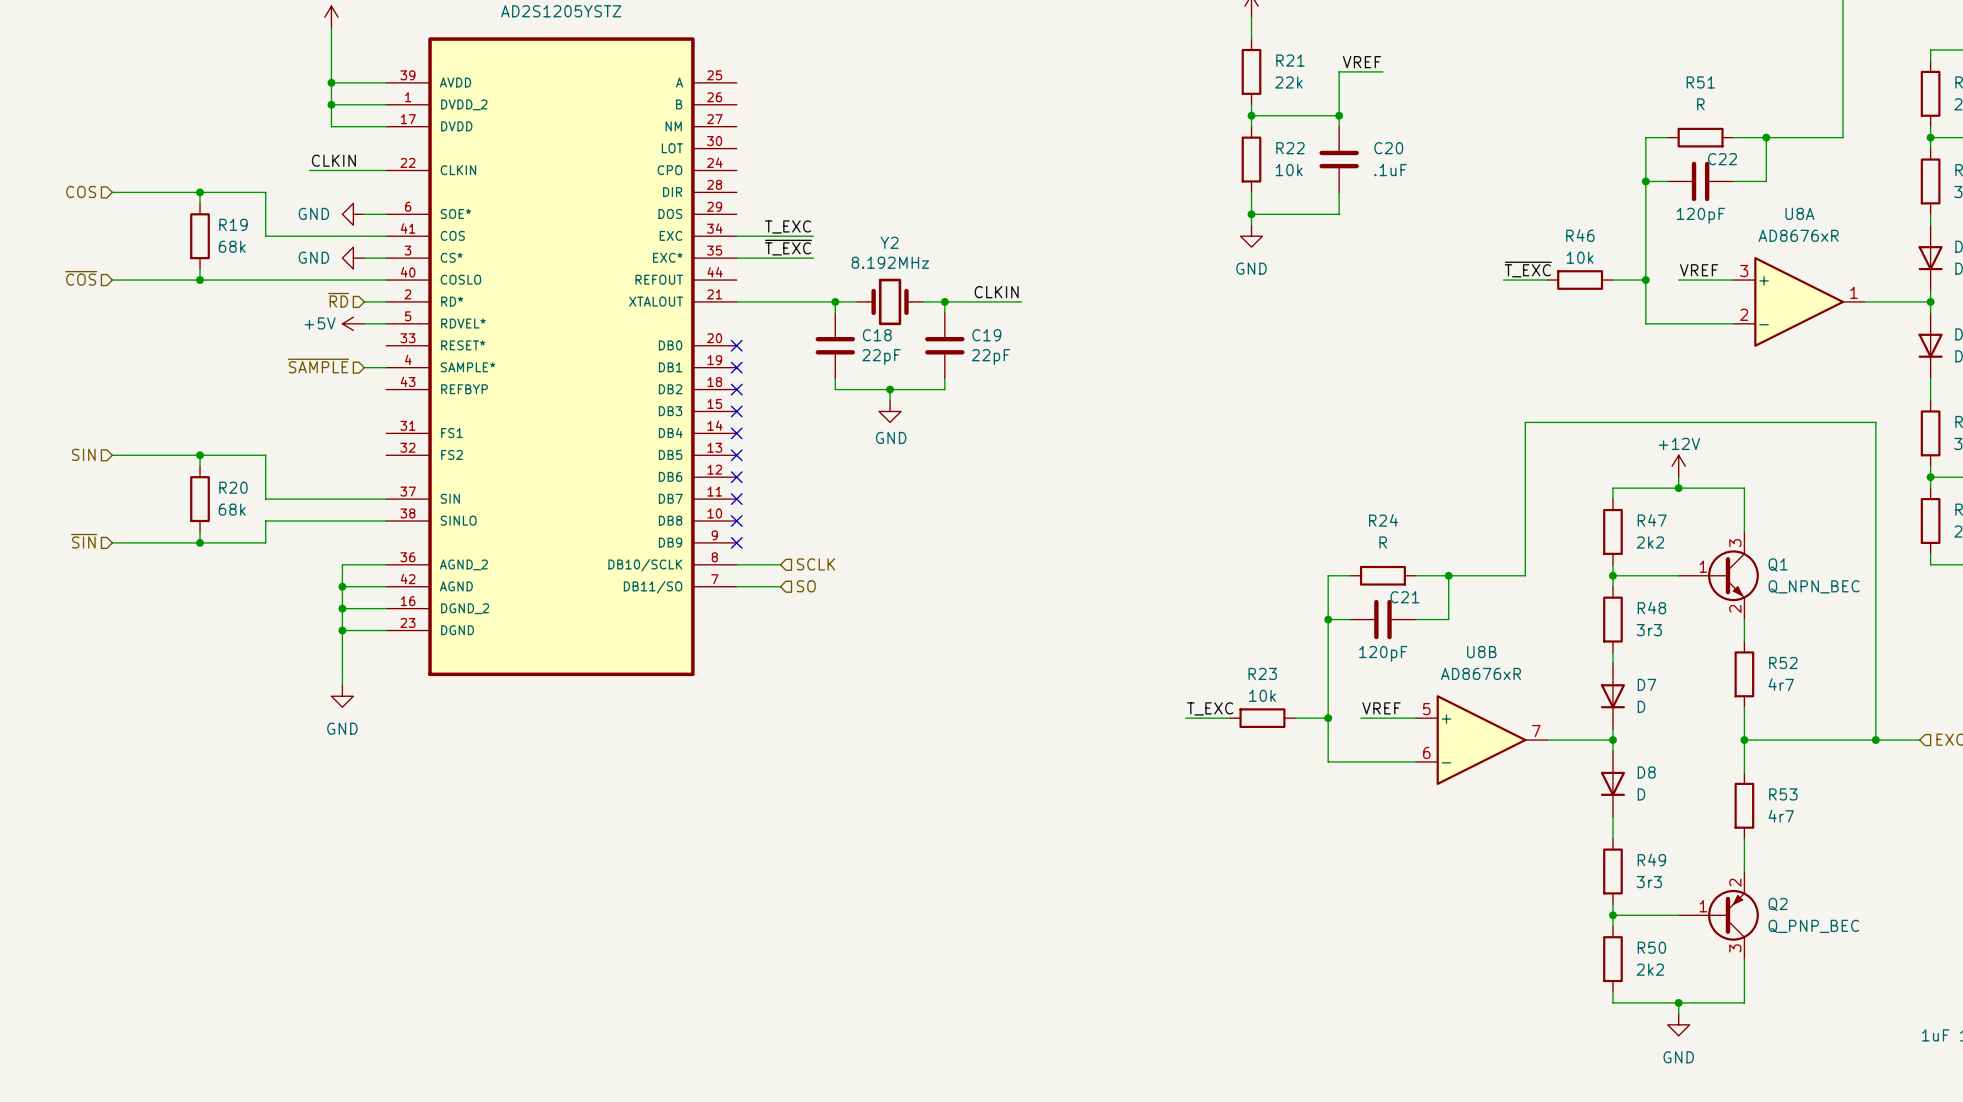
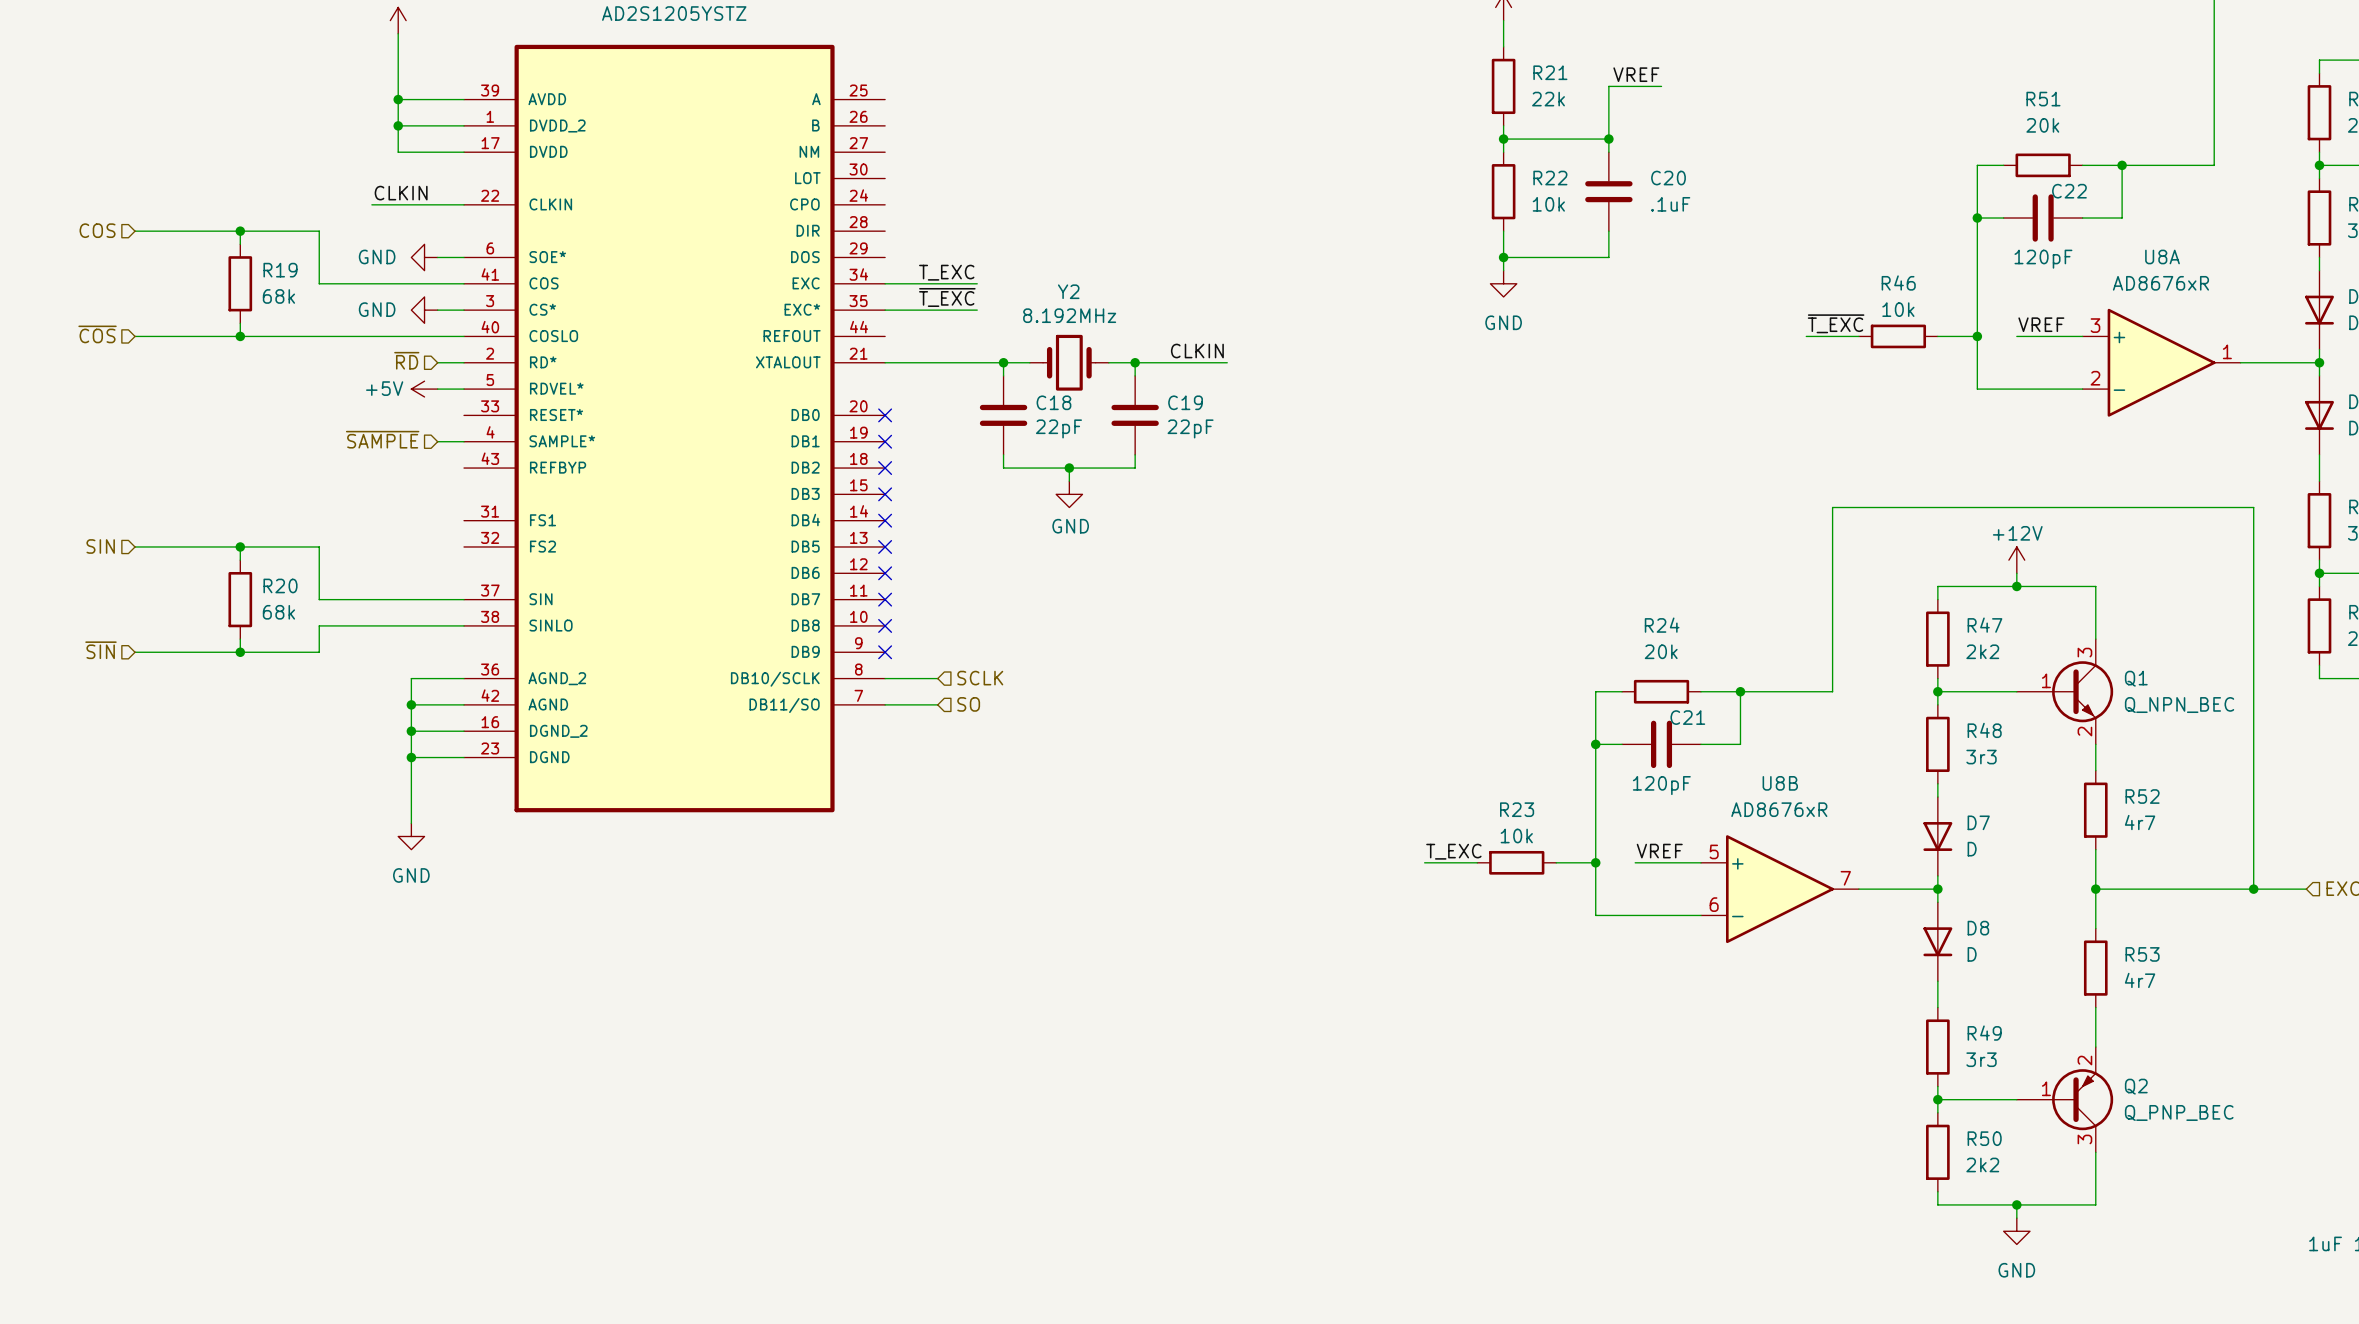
R51 value: R (1700, 104) -> 20k (2042, 125)
R24 value: R (1383, 542) -> 20k (1661, 651)

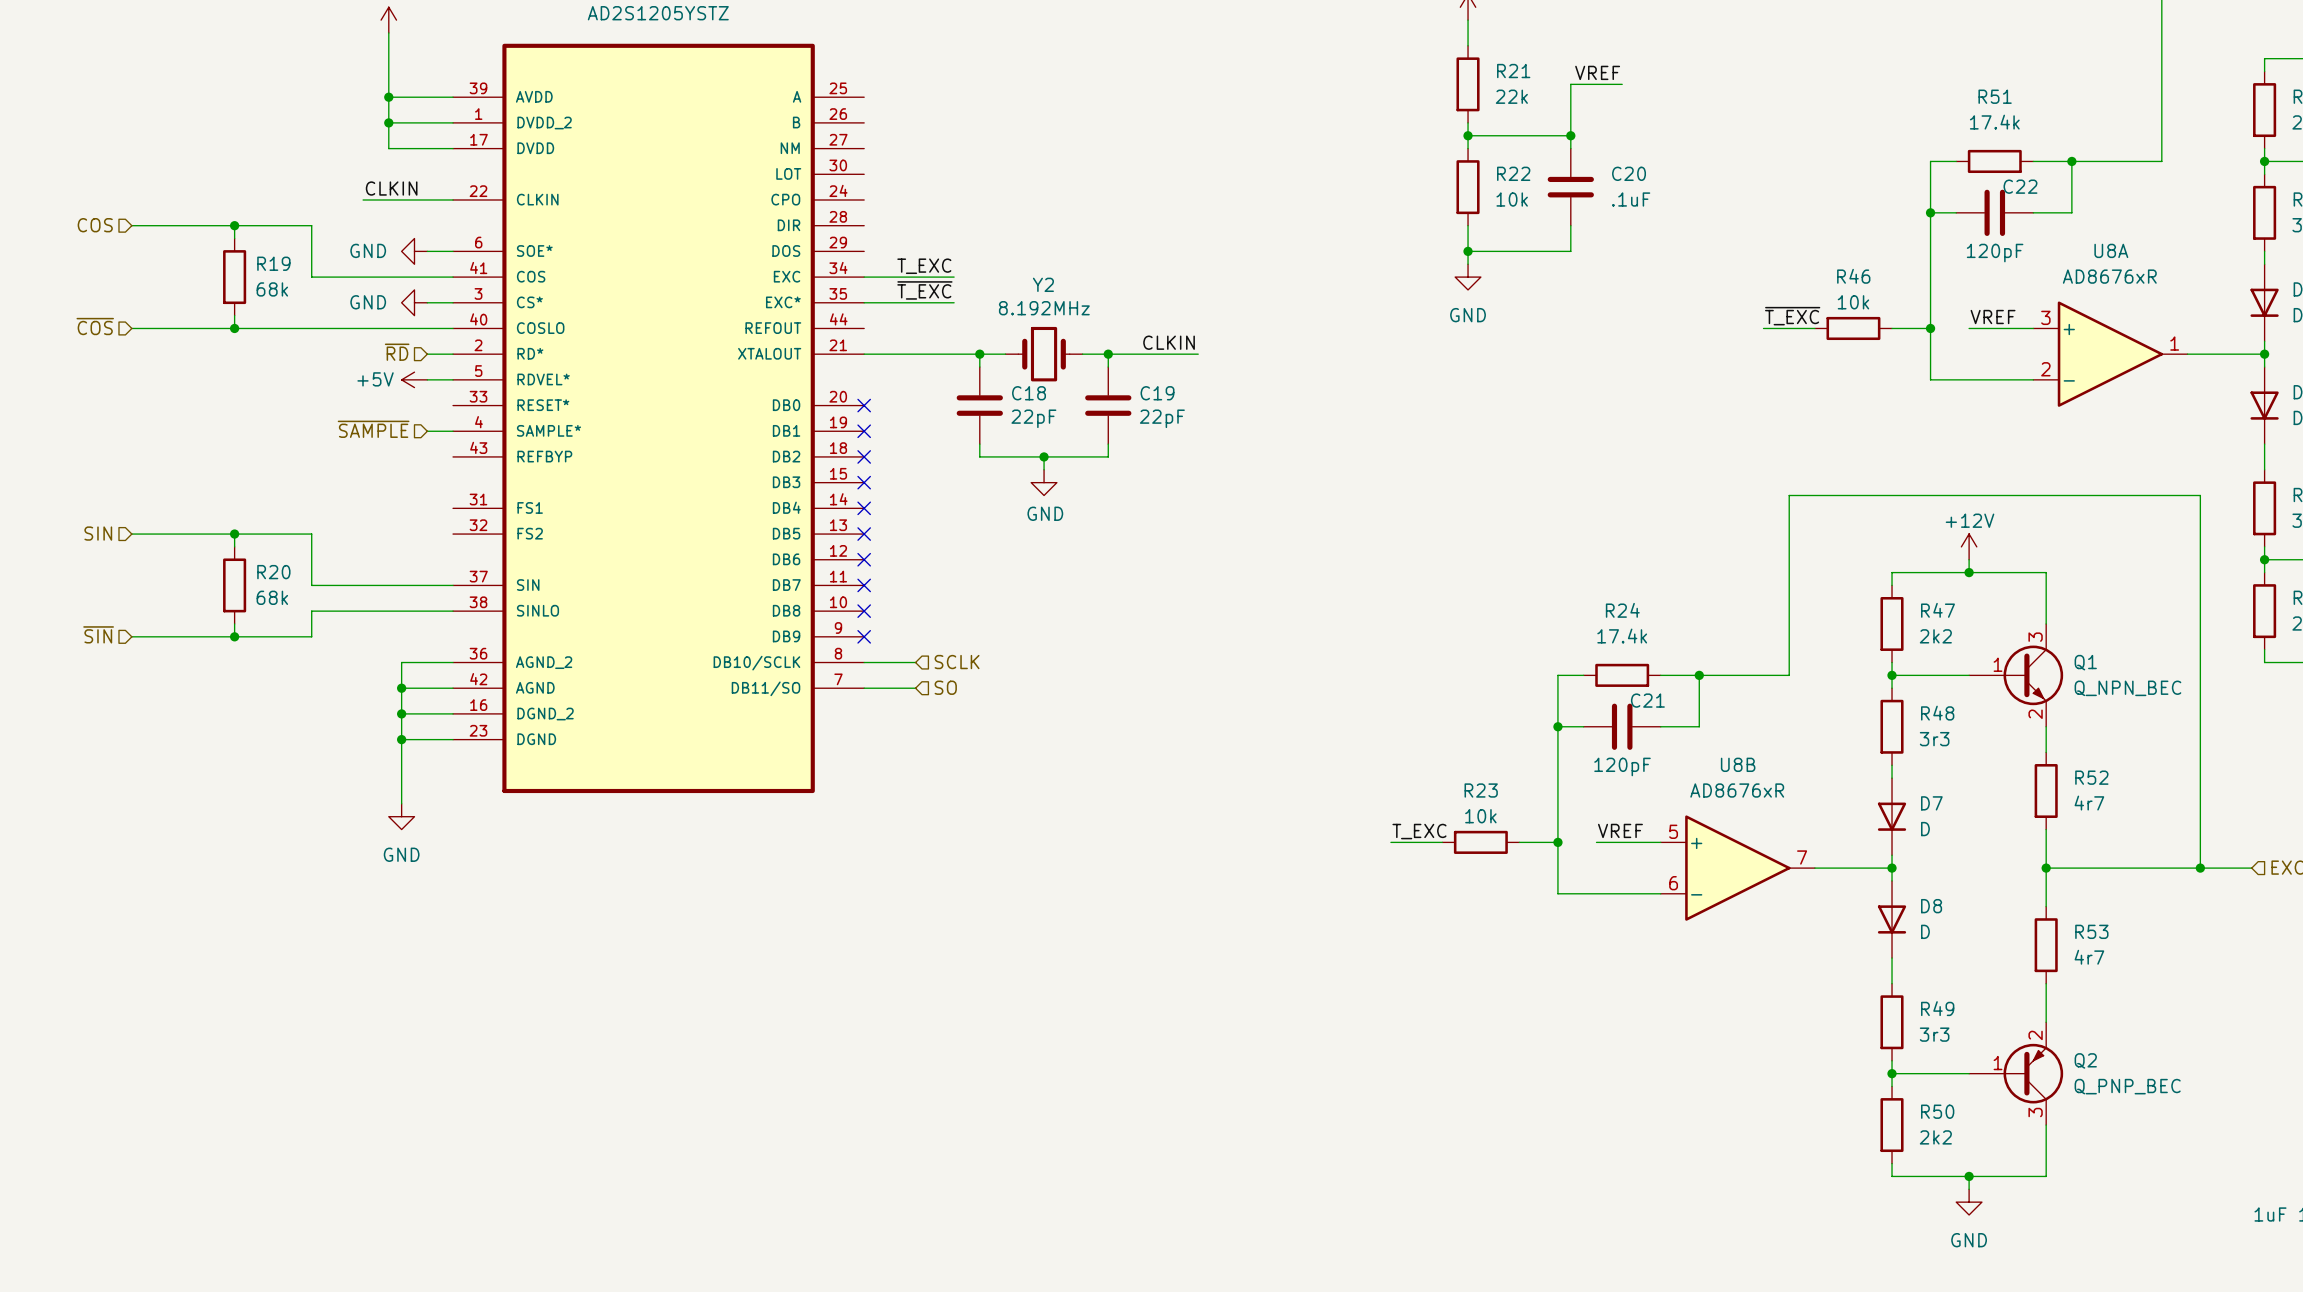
R51 value: 20k (2042, 125) -> 17.4k (1994, 122)
R24 value: 20k (1661, 651) -> 17.4k (1622, 636)

